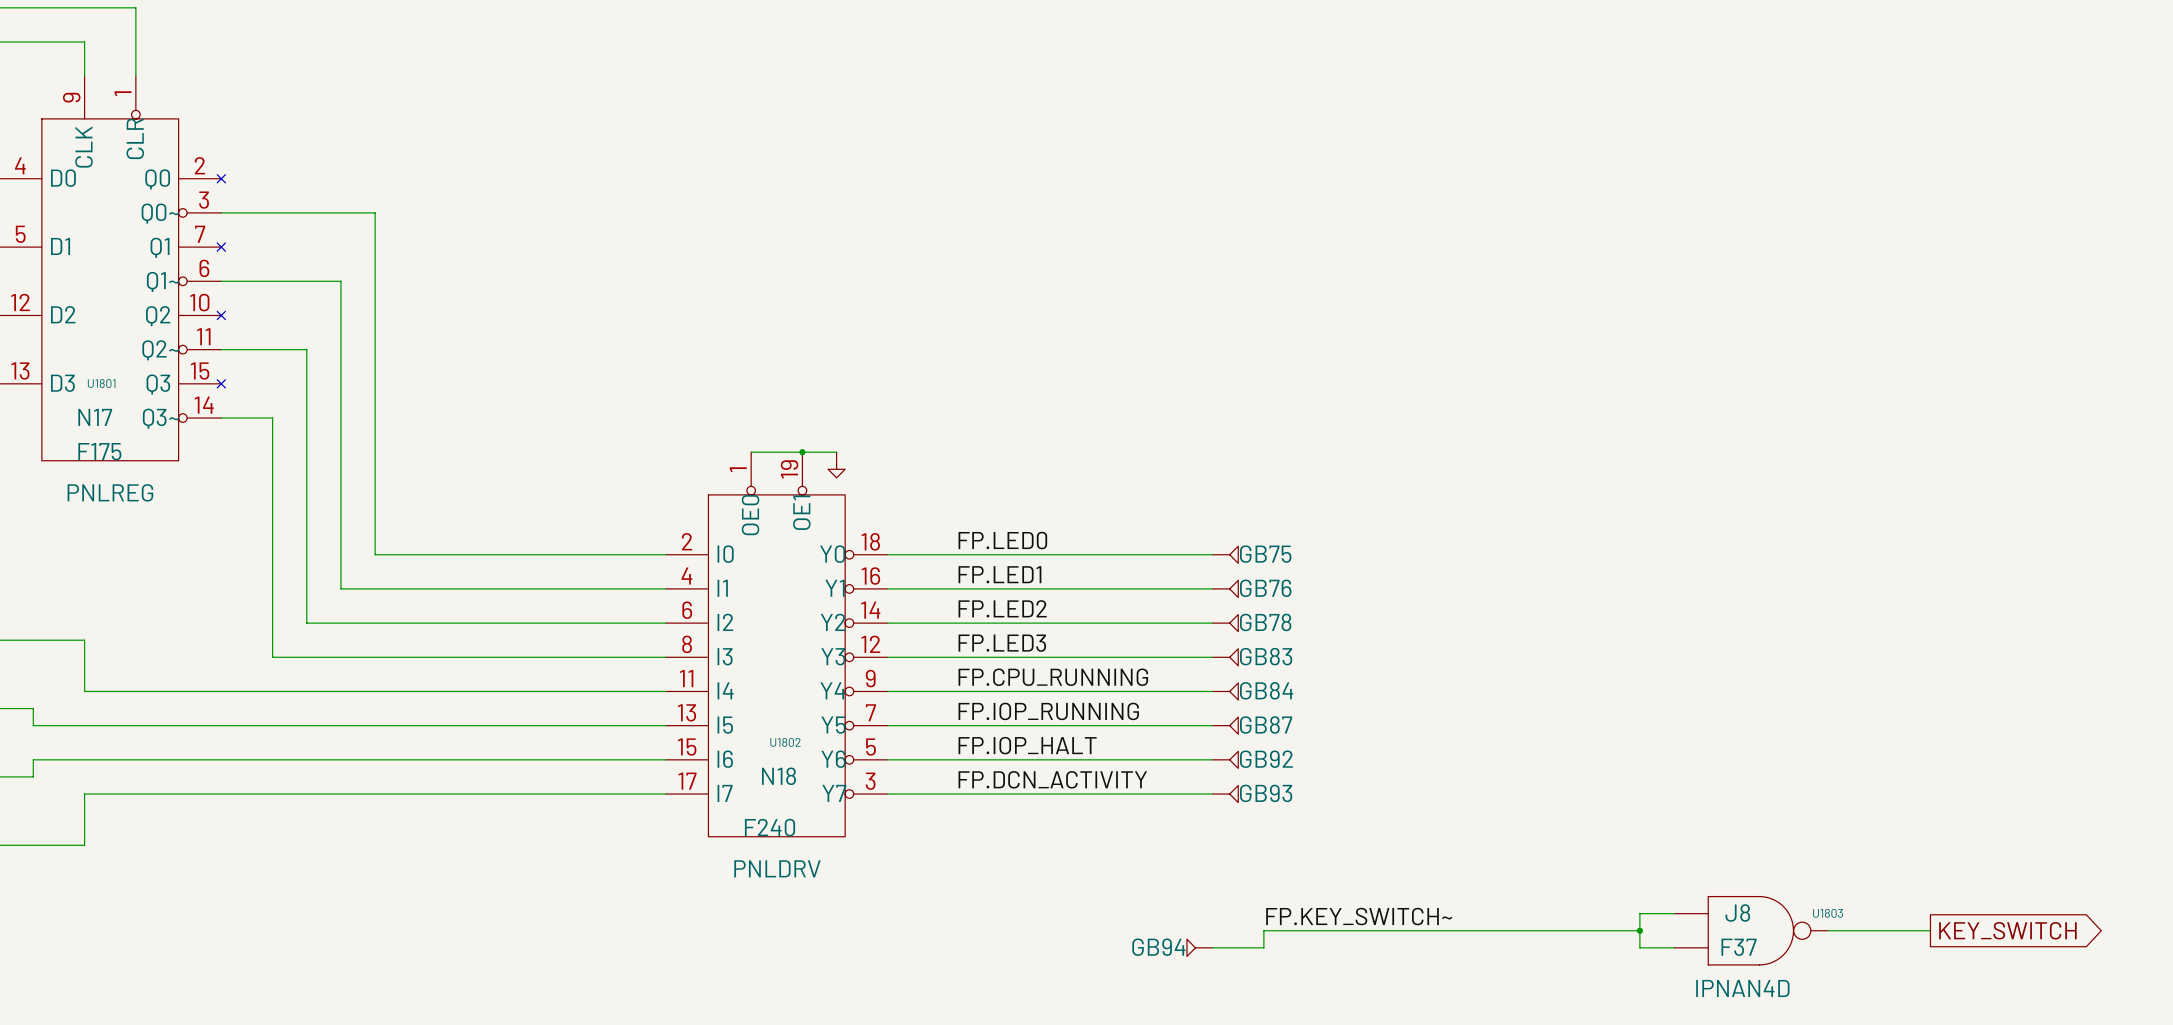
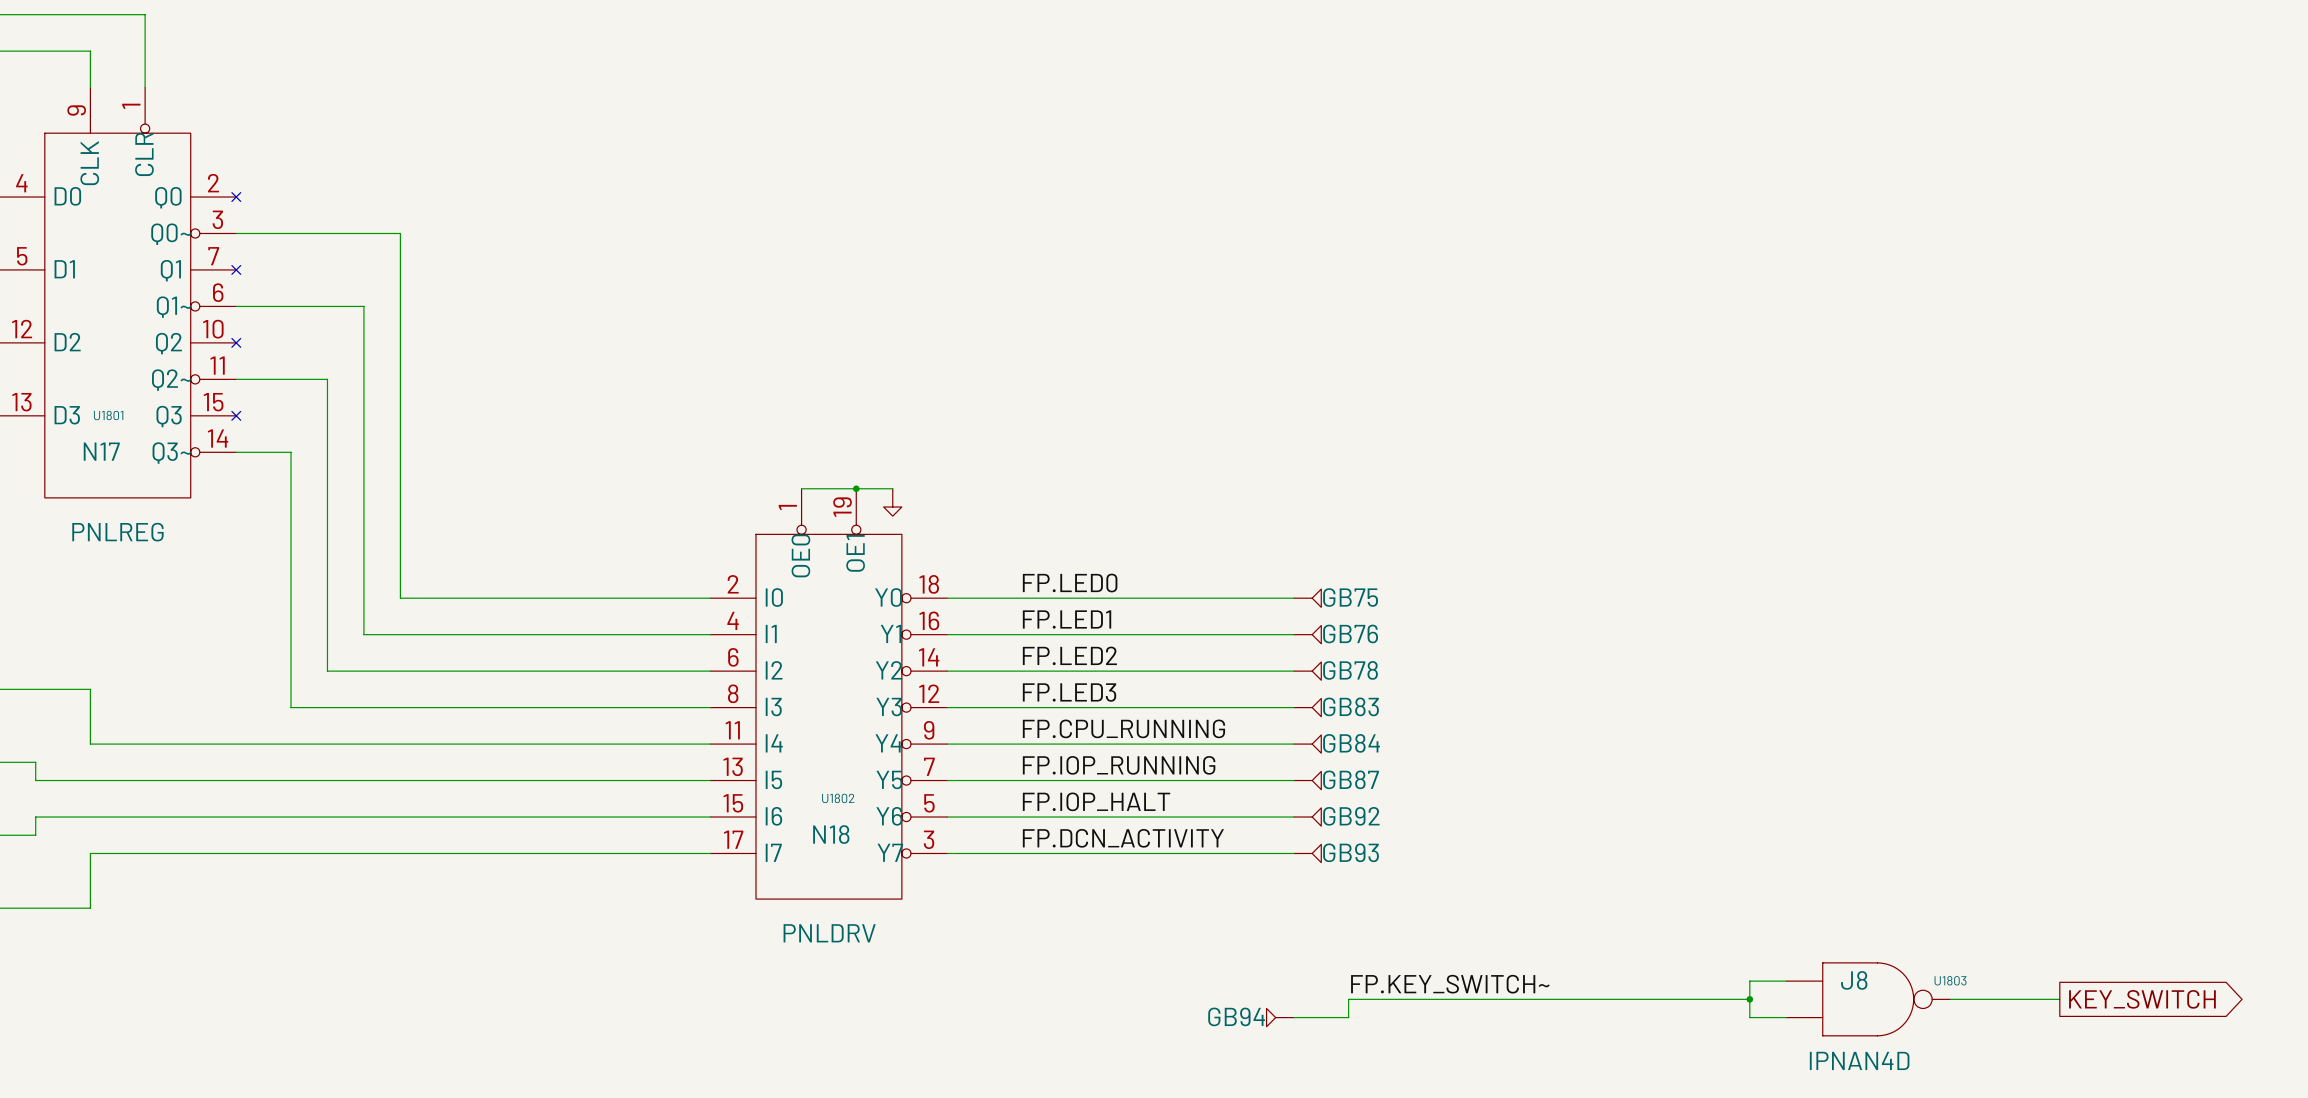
U1801 value: F175 (99, 451) -> none
U1802 value: F240 (769, 827) -> none
U1803 value: F37 (1739, 947) -> none

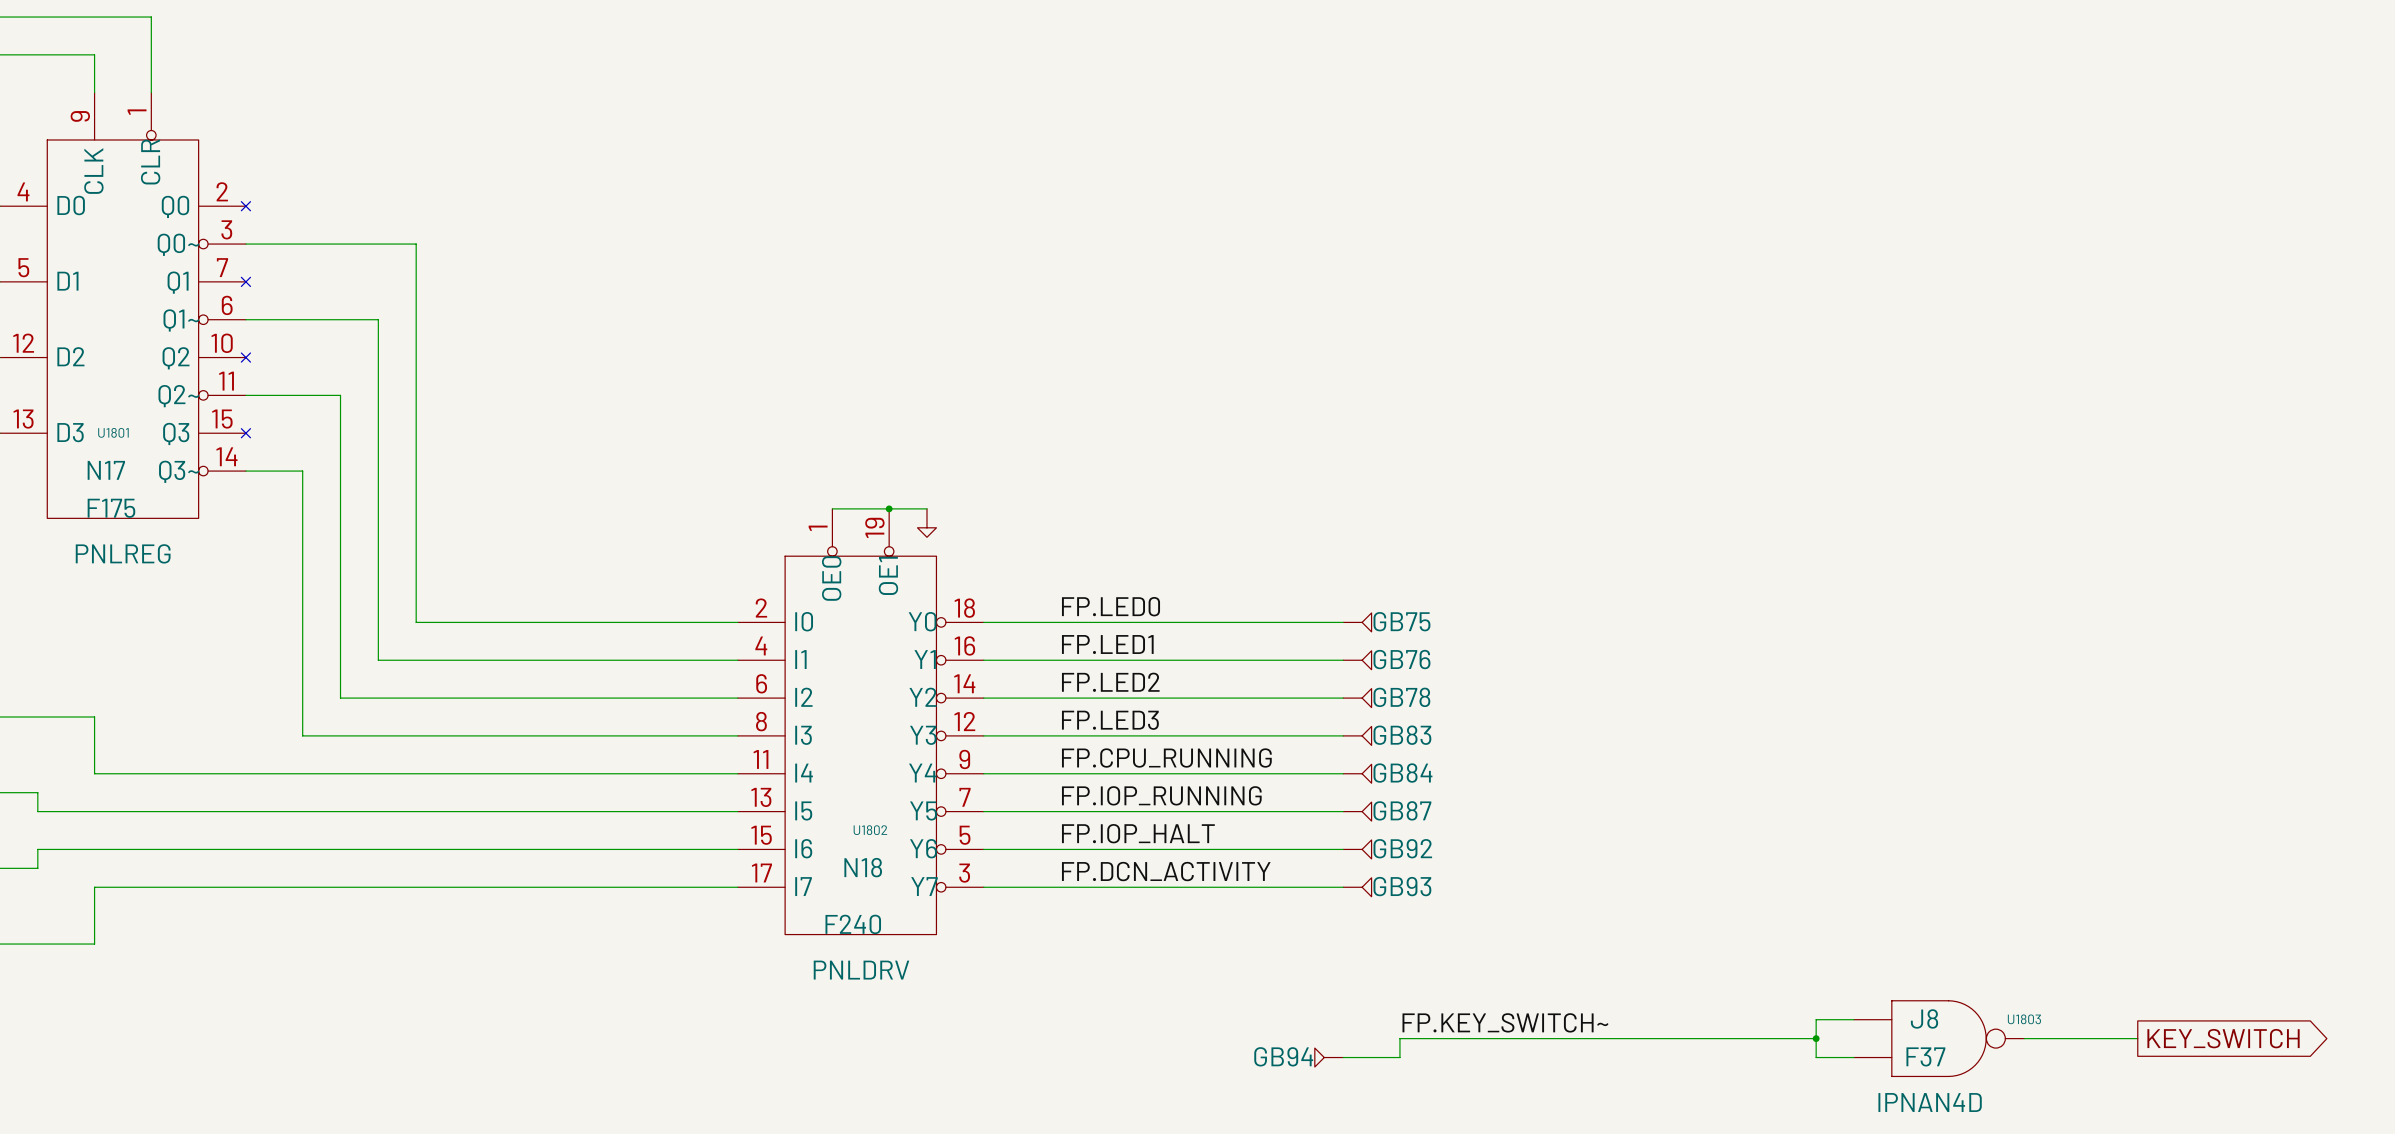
U1801 value: none -> F175 (111, 508)
U1802 value: none -> F240 (853, 924)
U1803 value: none -> F37 (1925, 1056)

